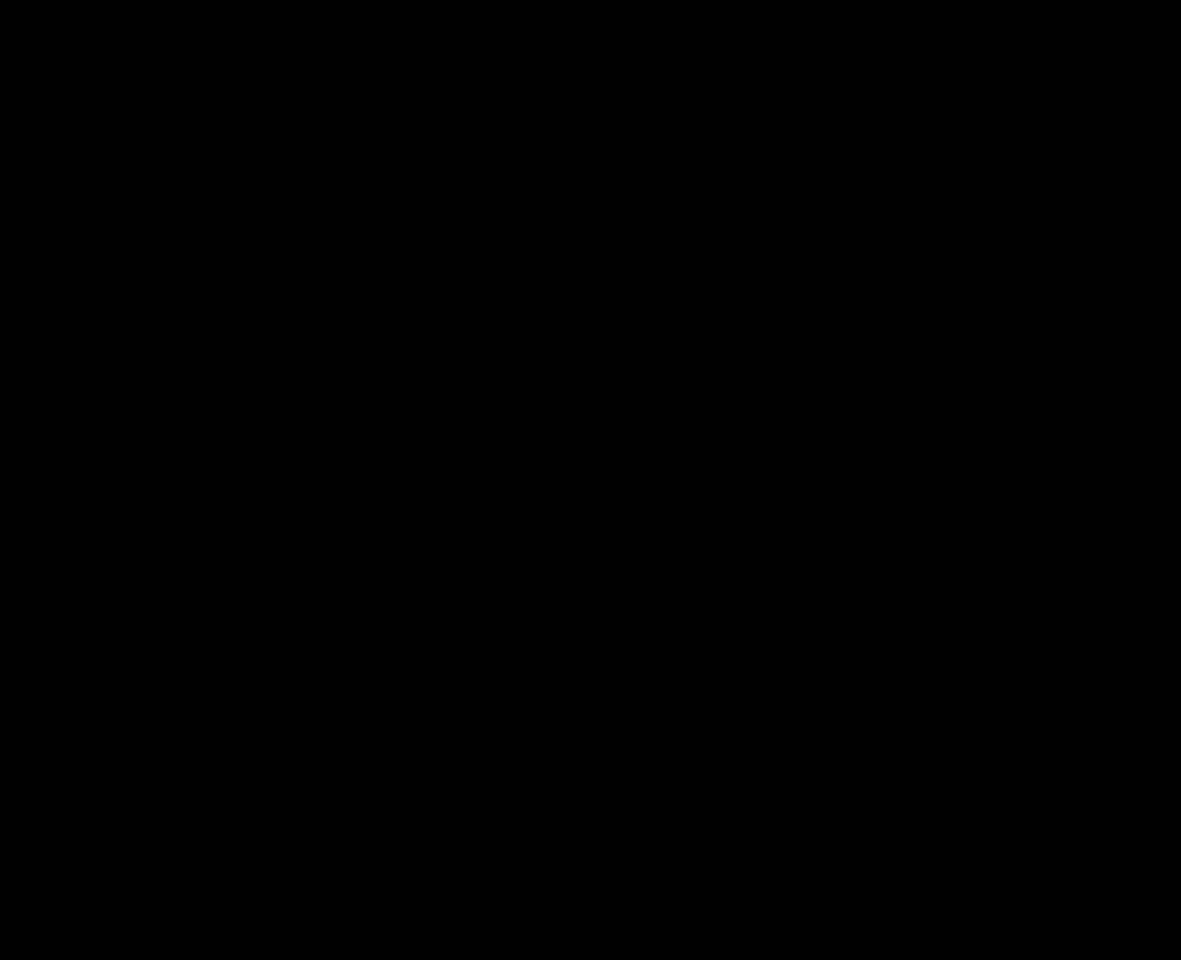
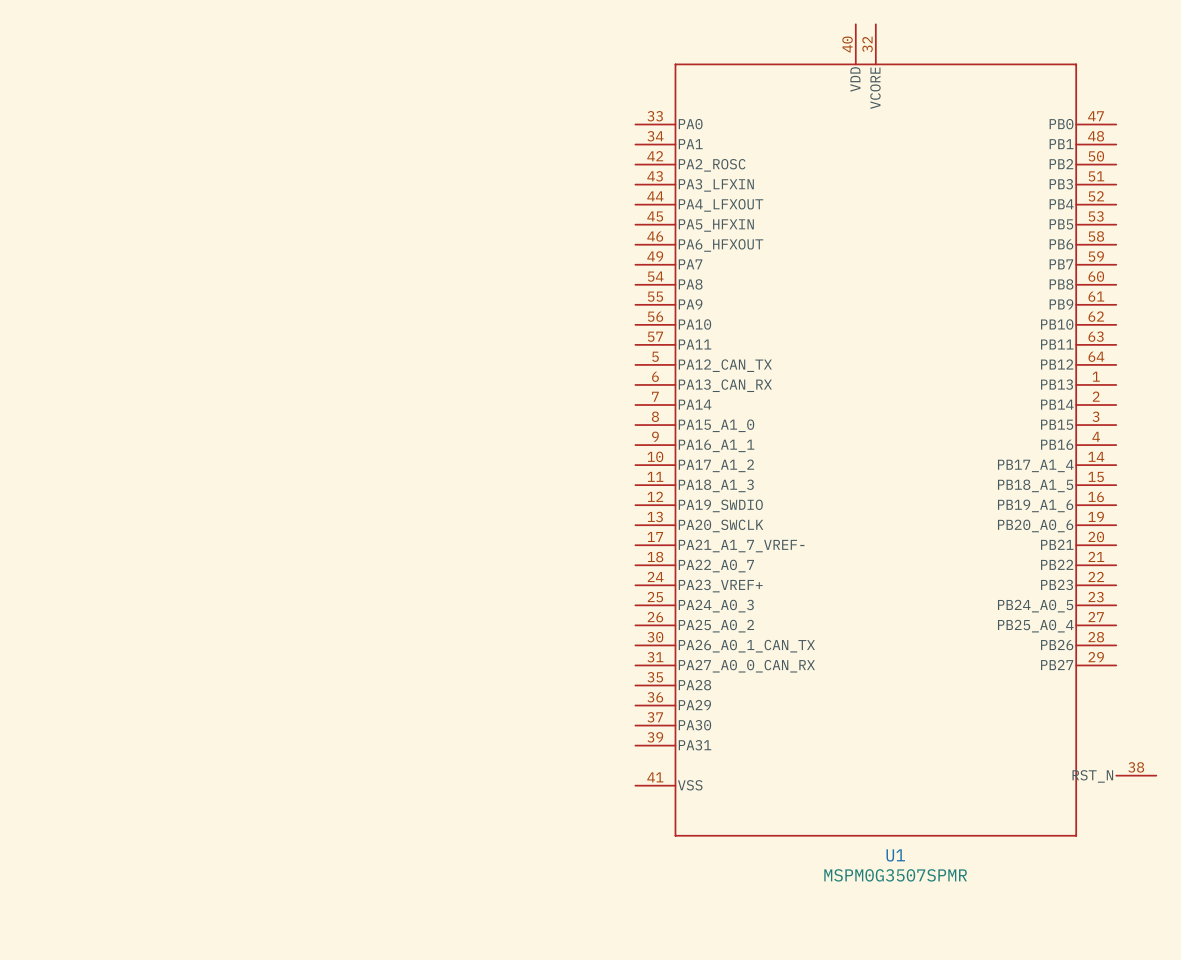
U1: none -> MSPM0G3507SPMR (895, 430)

